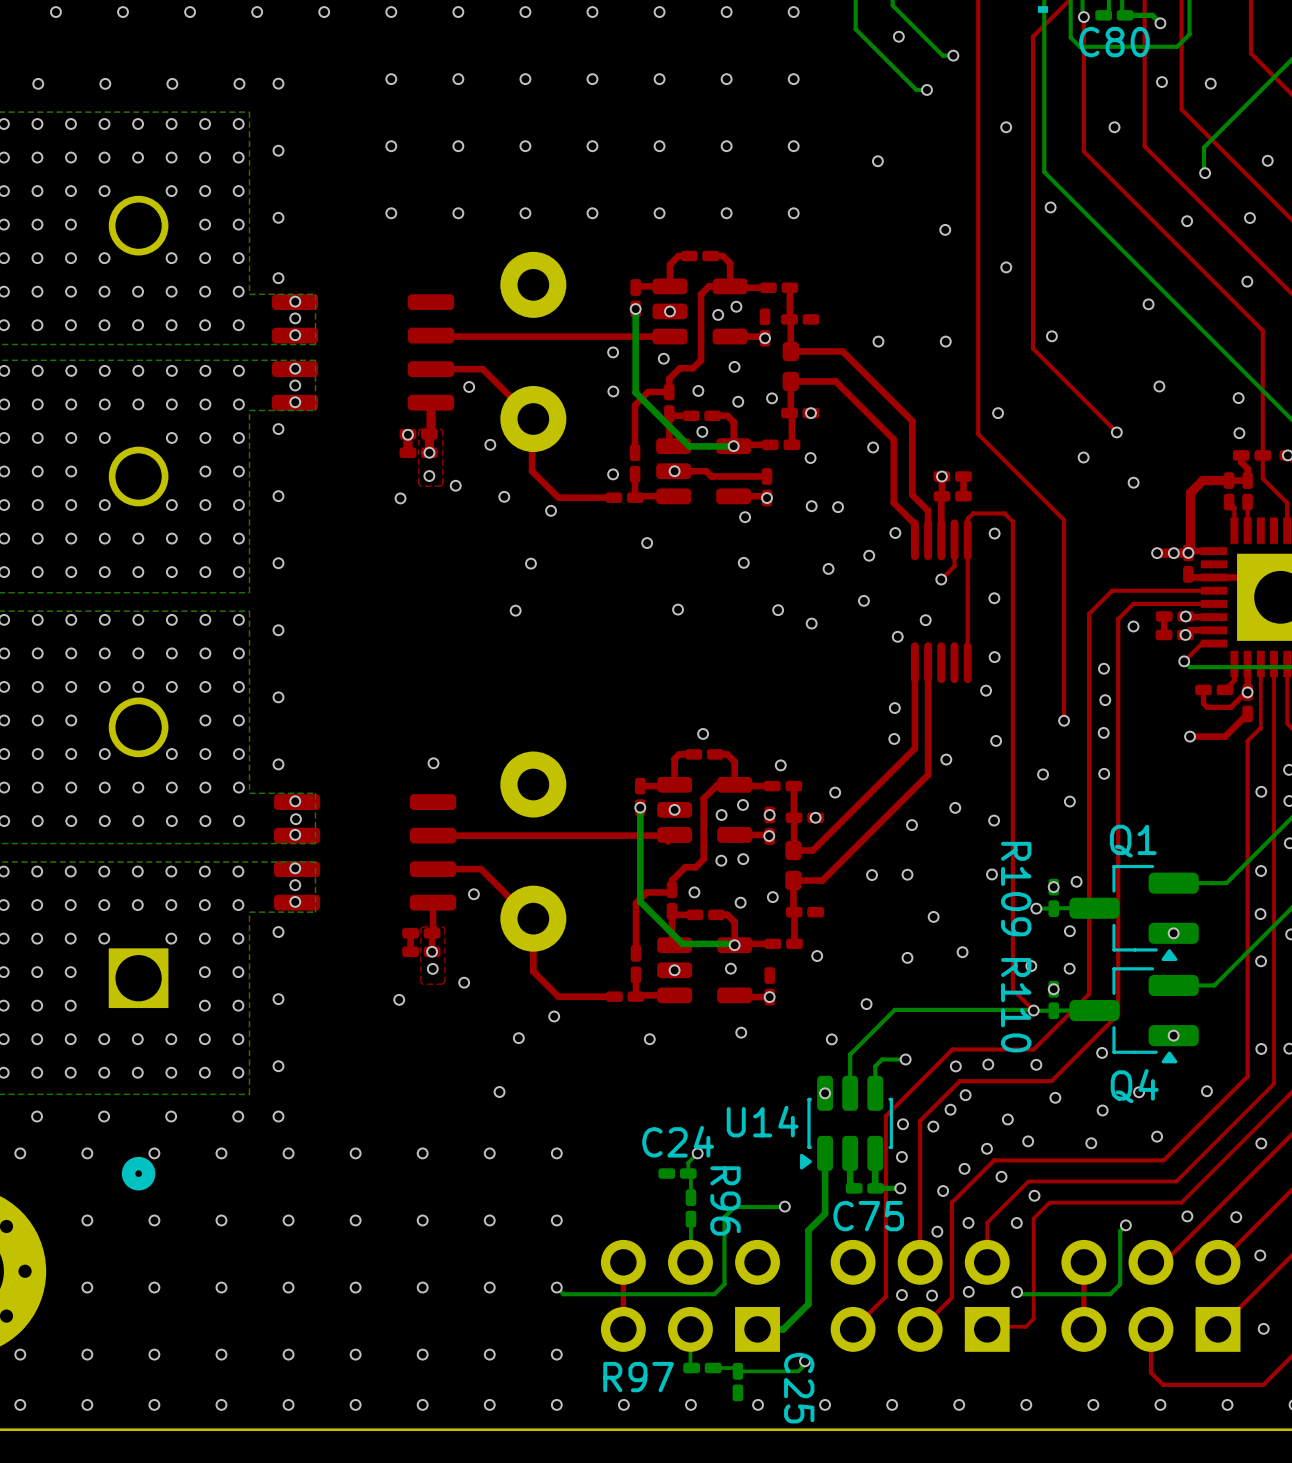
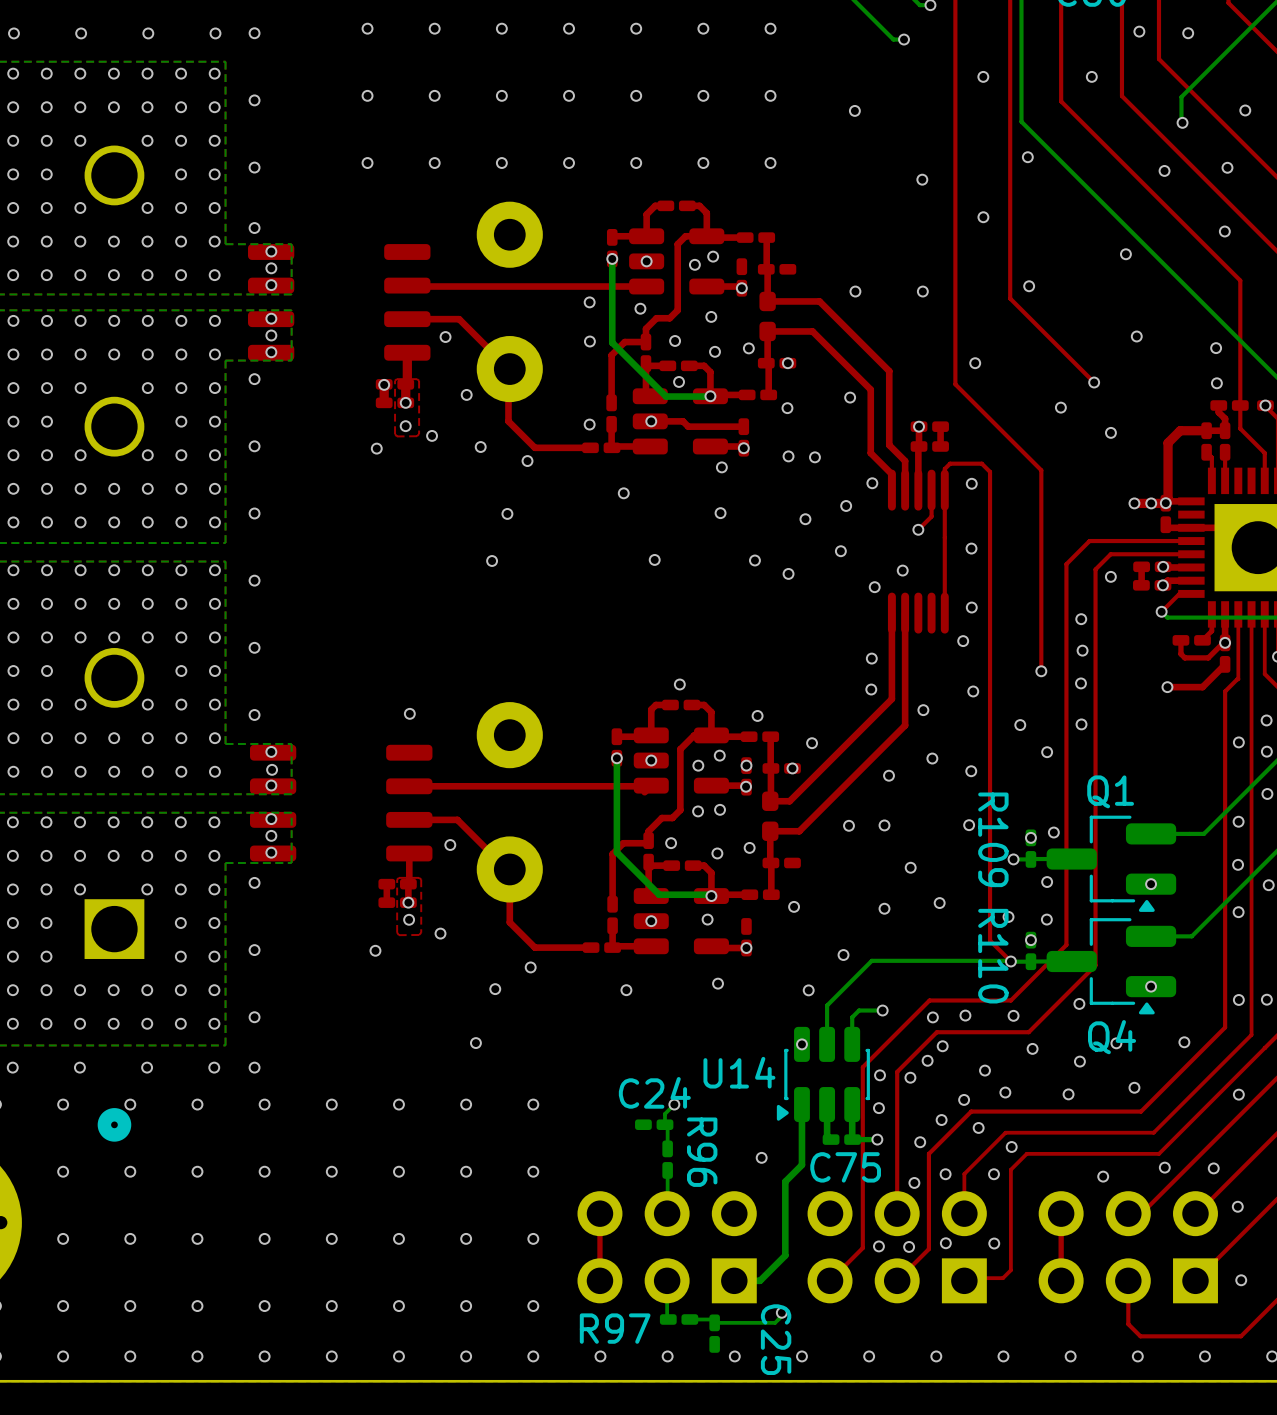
bottom track: (784, 1206) (734, 1207) (724, 1217) (724, 1284) (714, 1294) (563, 1294) (556, 1287) -> none
bottom track: (1125, 1225) (1120, 1231) (1120, 1284) (1110, 1294) (1019, 1294) (1017, 1292) -> none

